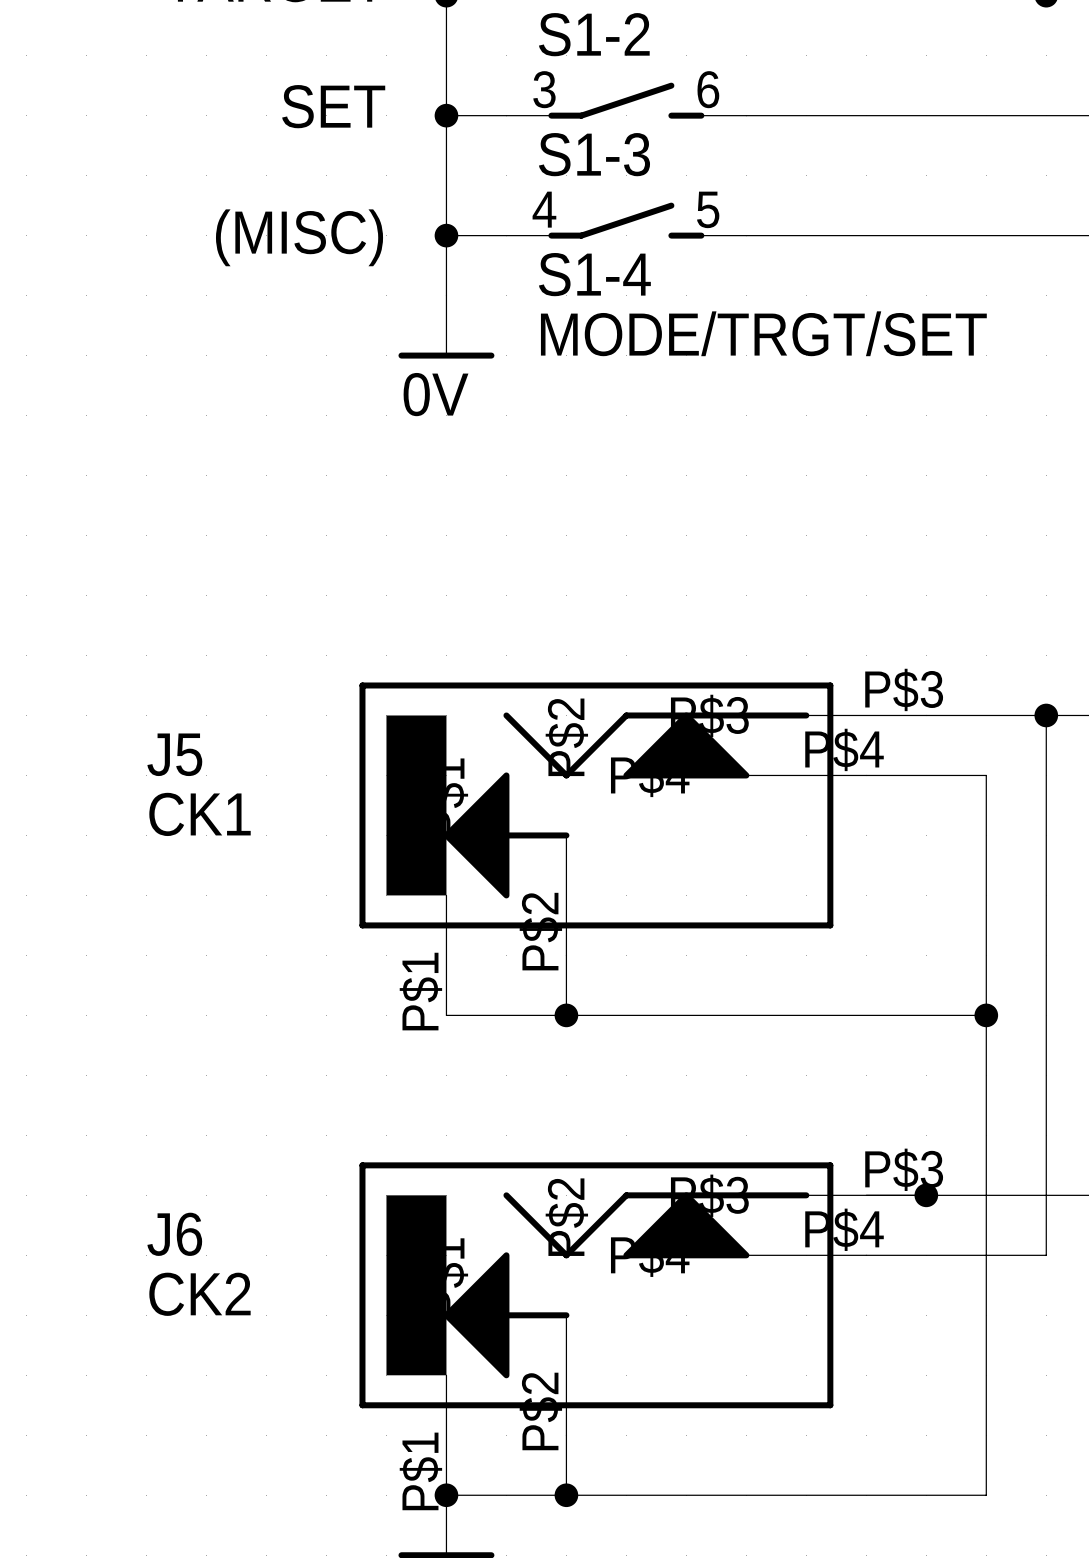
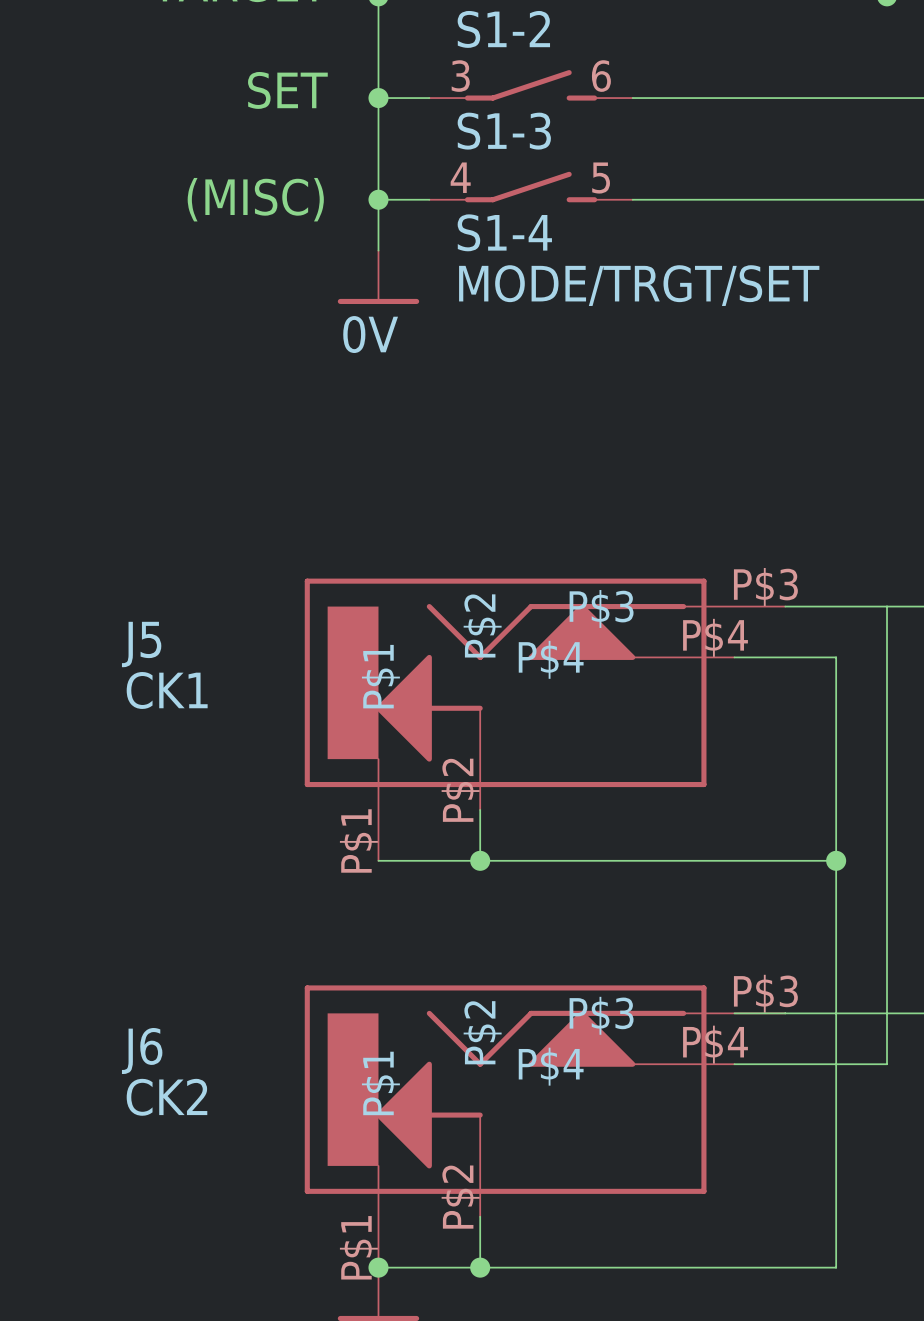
junction: (1046, 715) -> none
junction: (926, 1195) -> none

